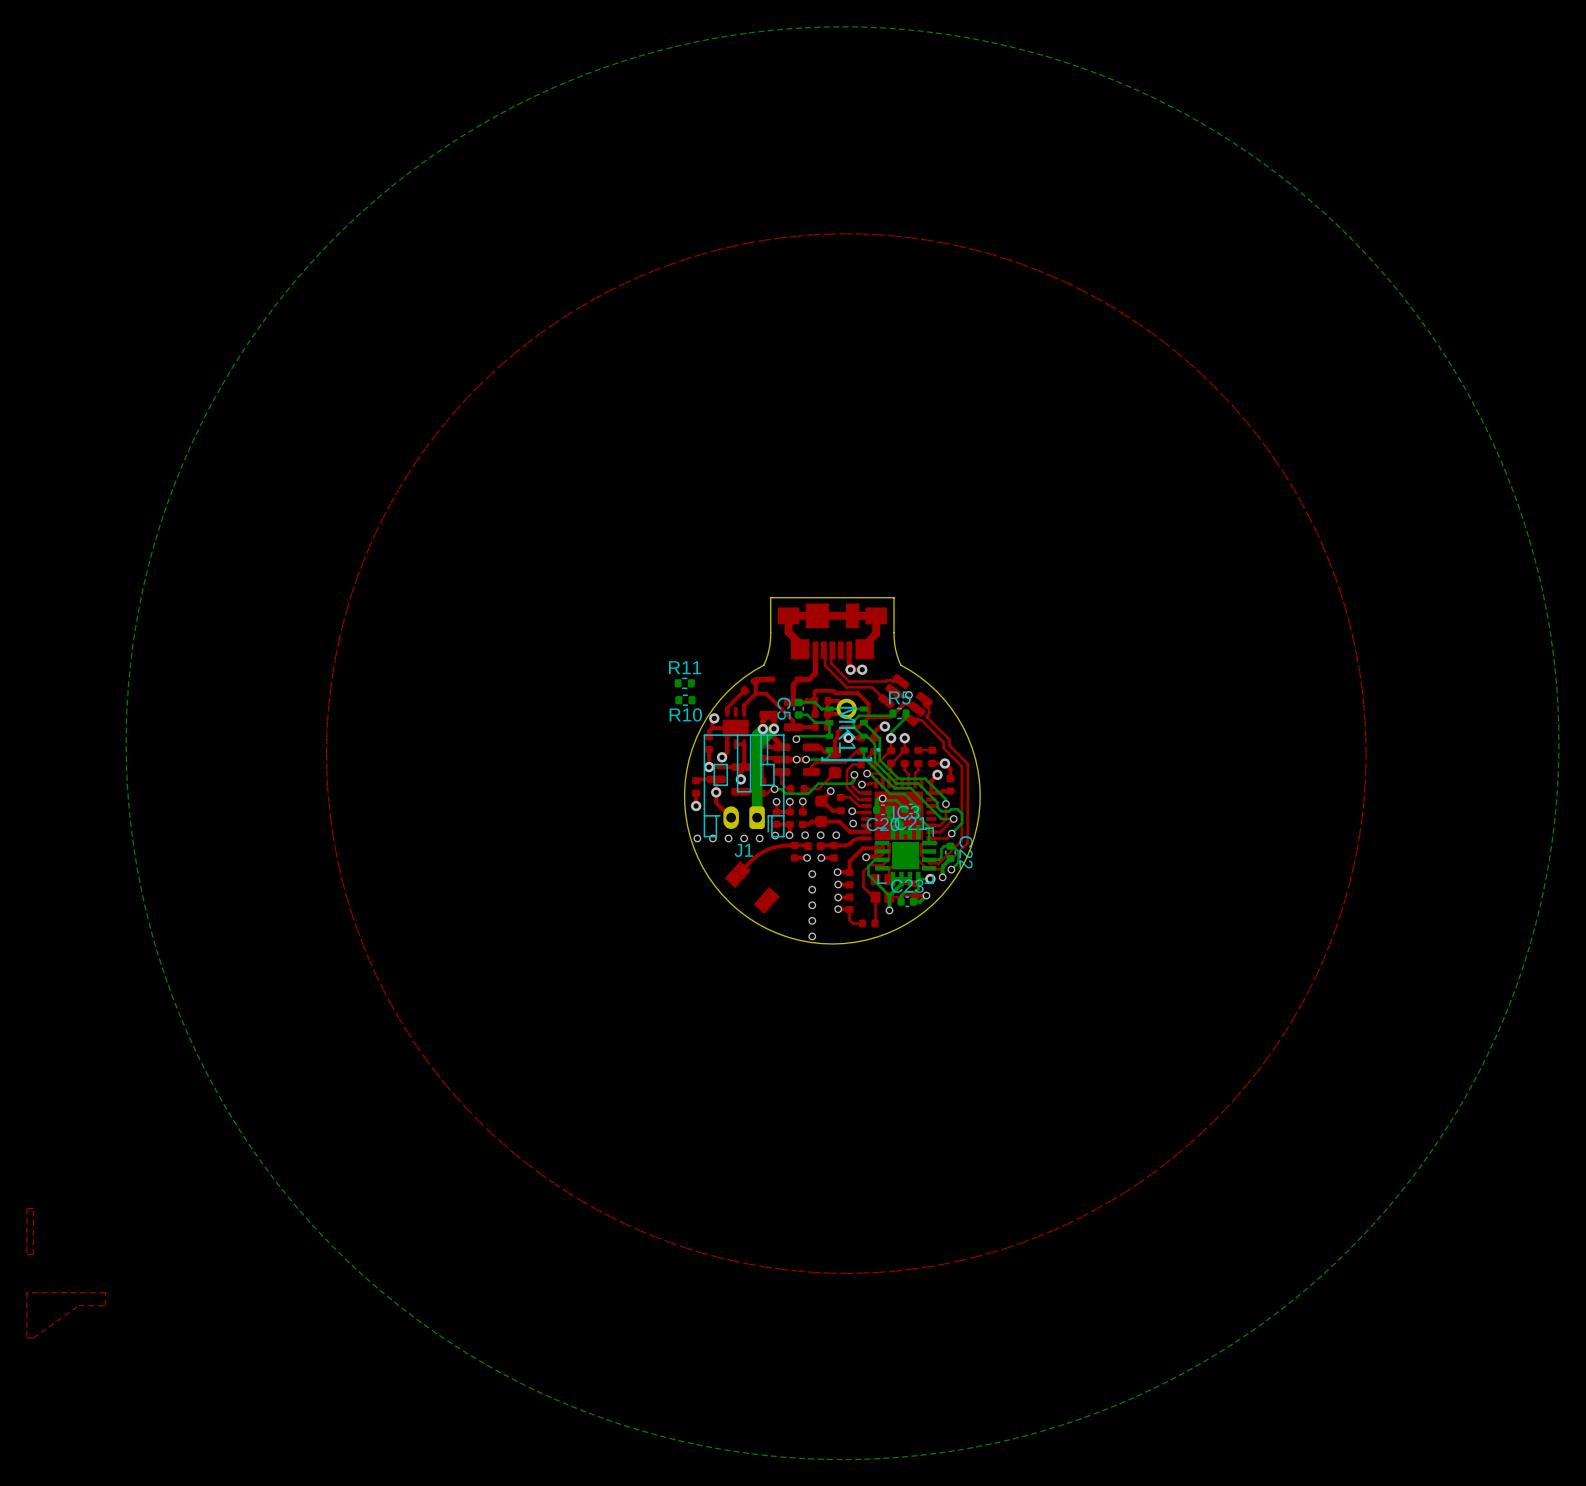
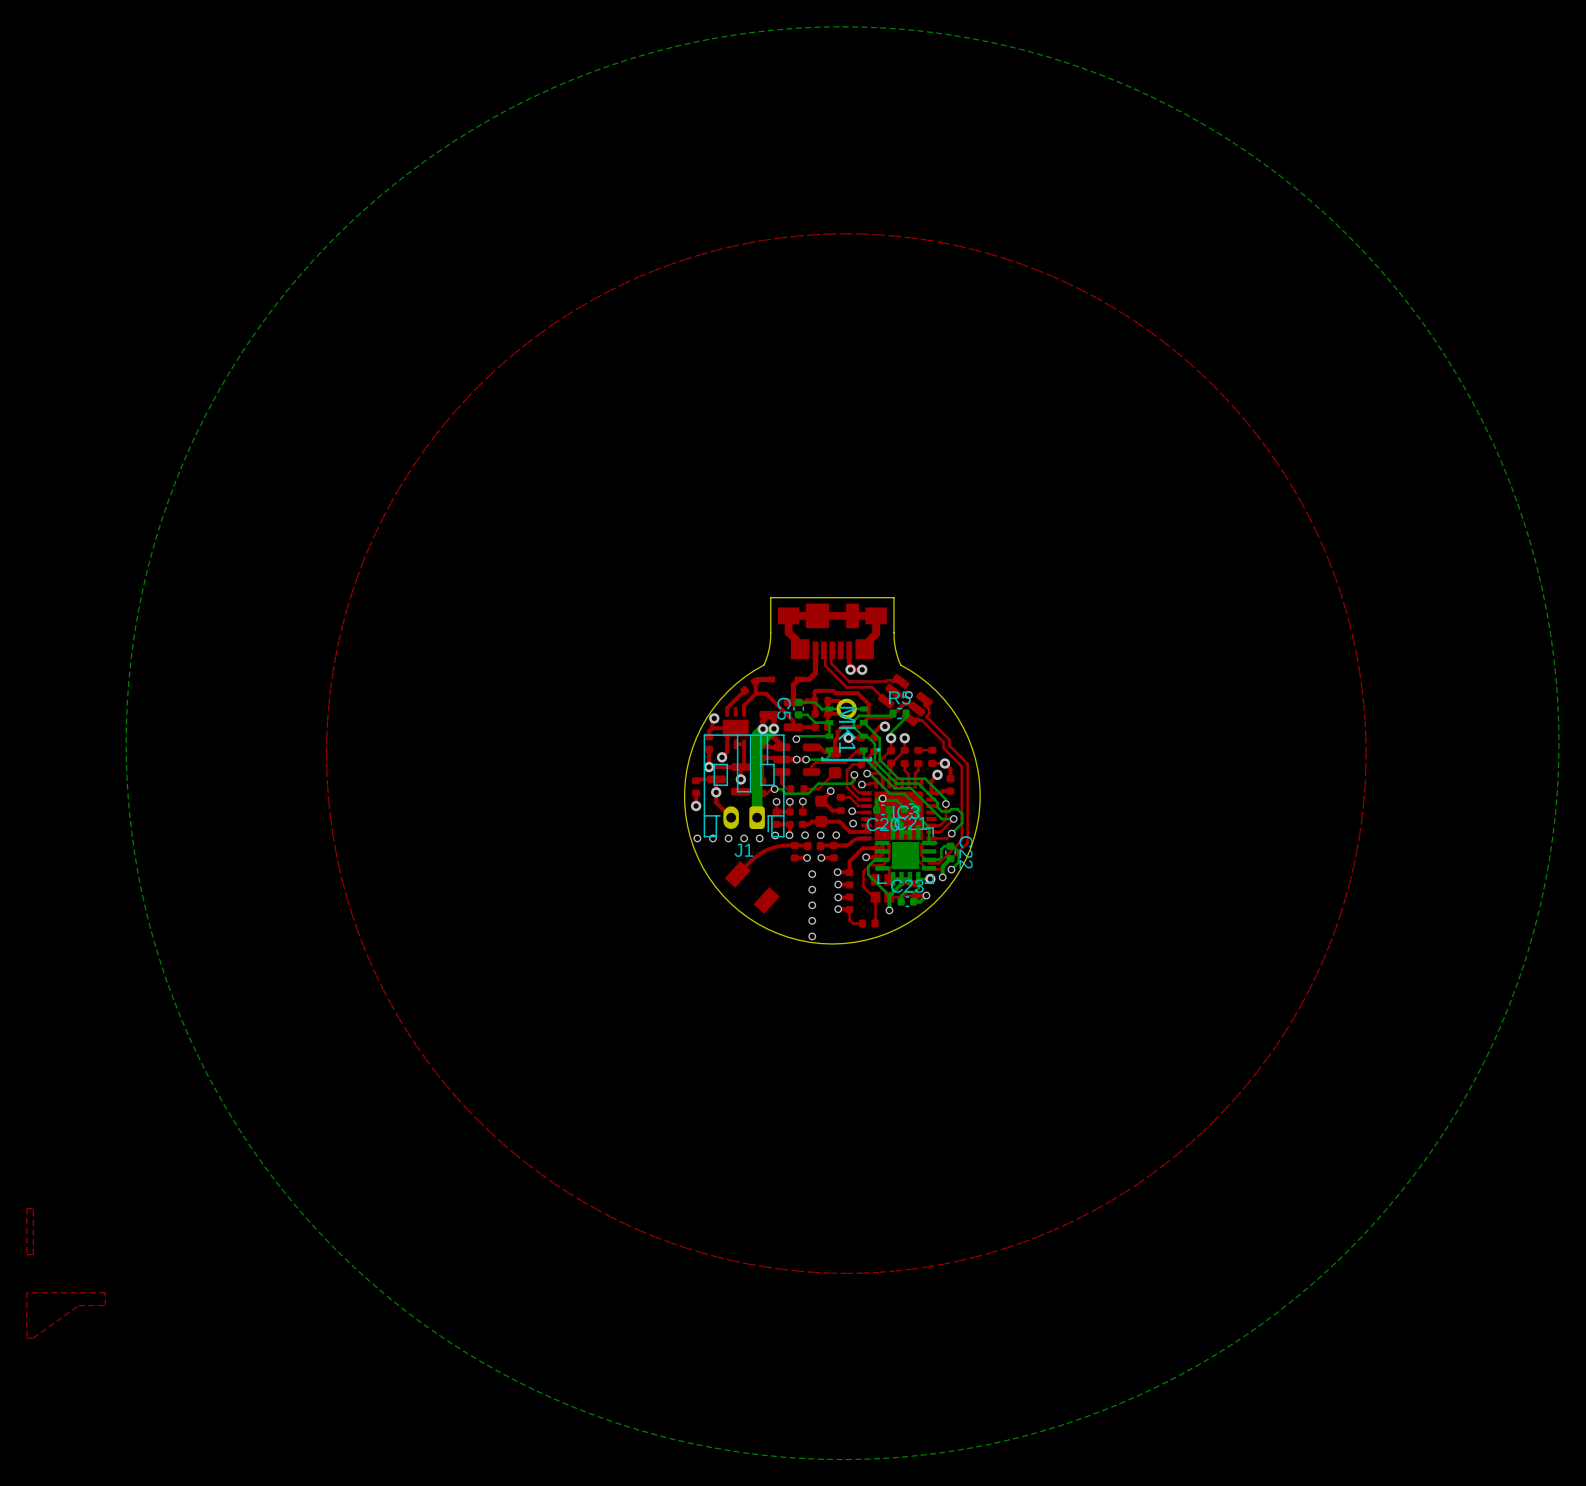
R11: (684, 683) -> none
R10: (685, 700) -> none

